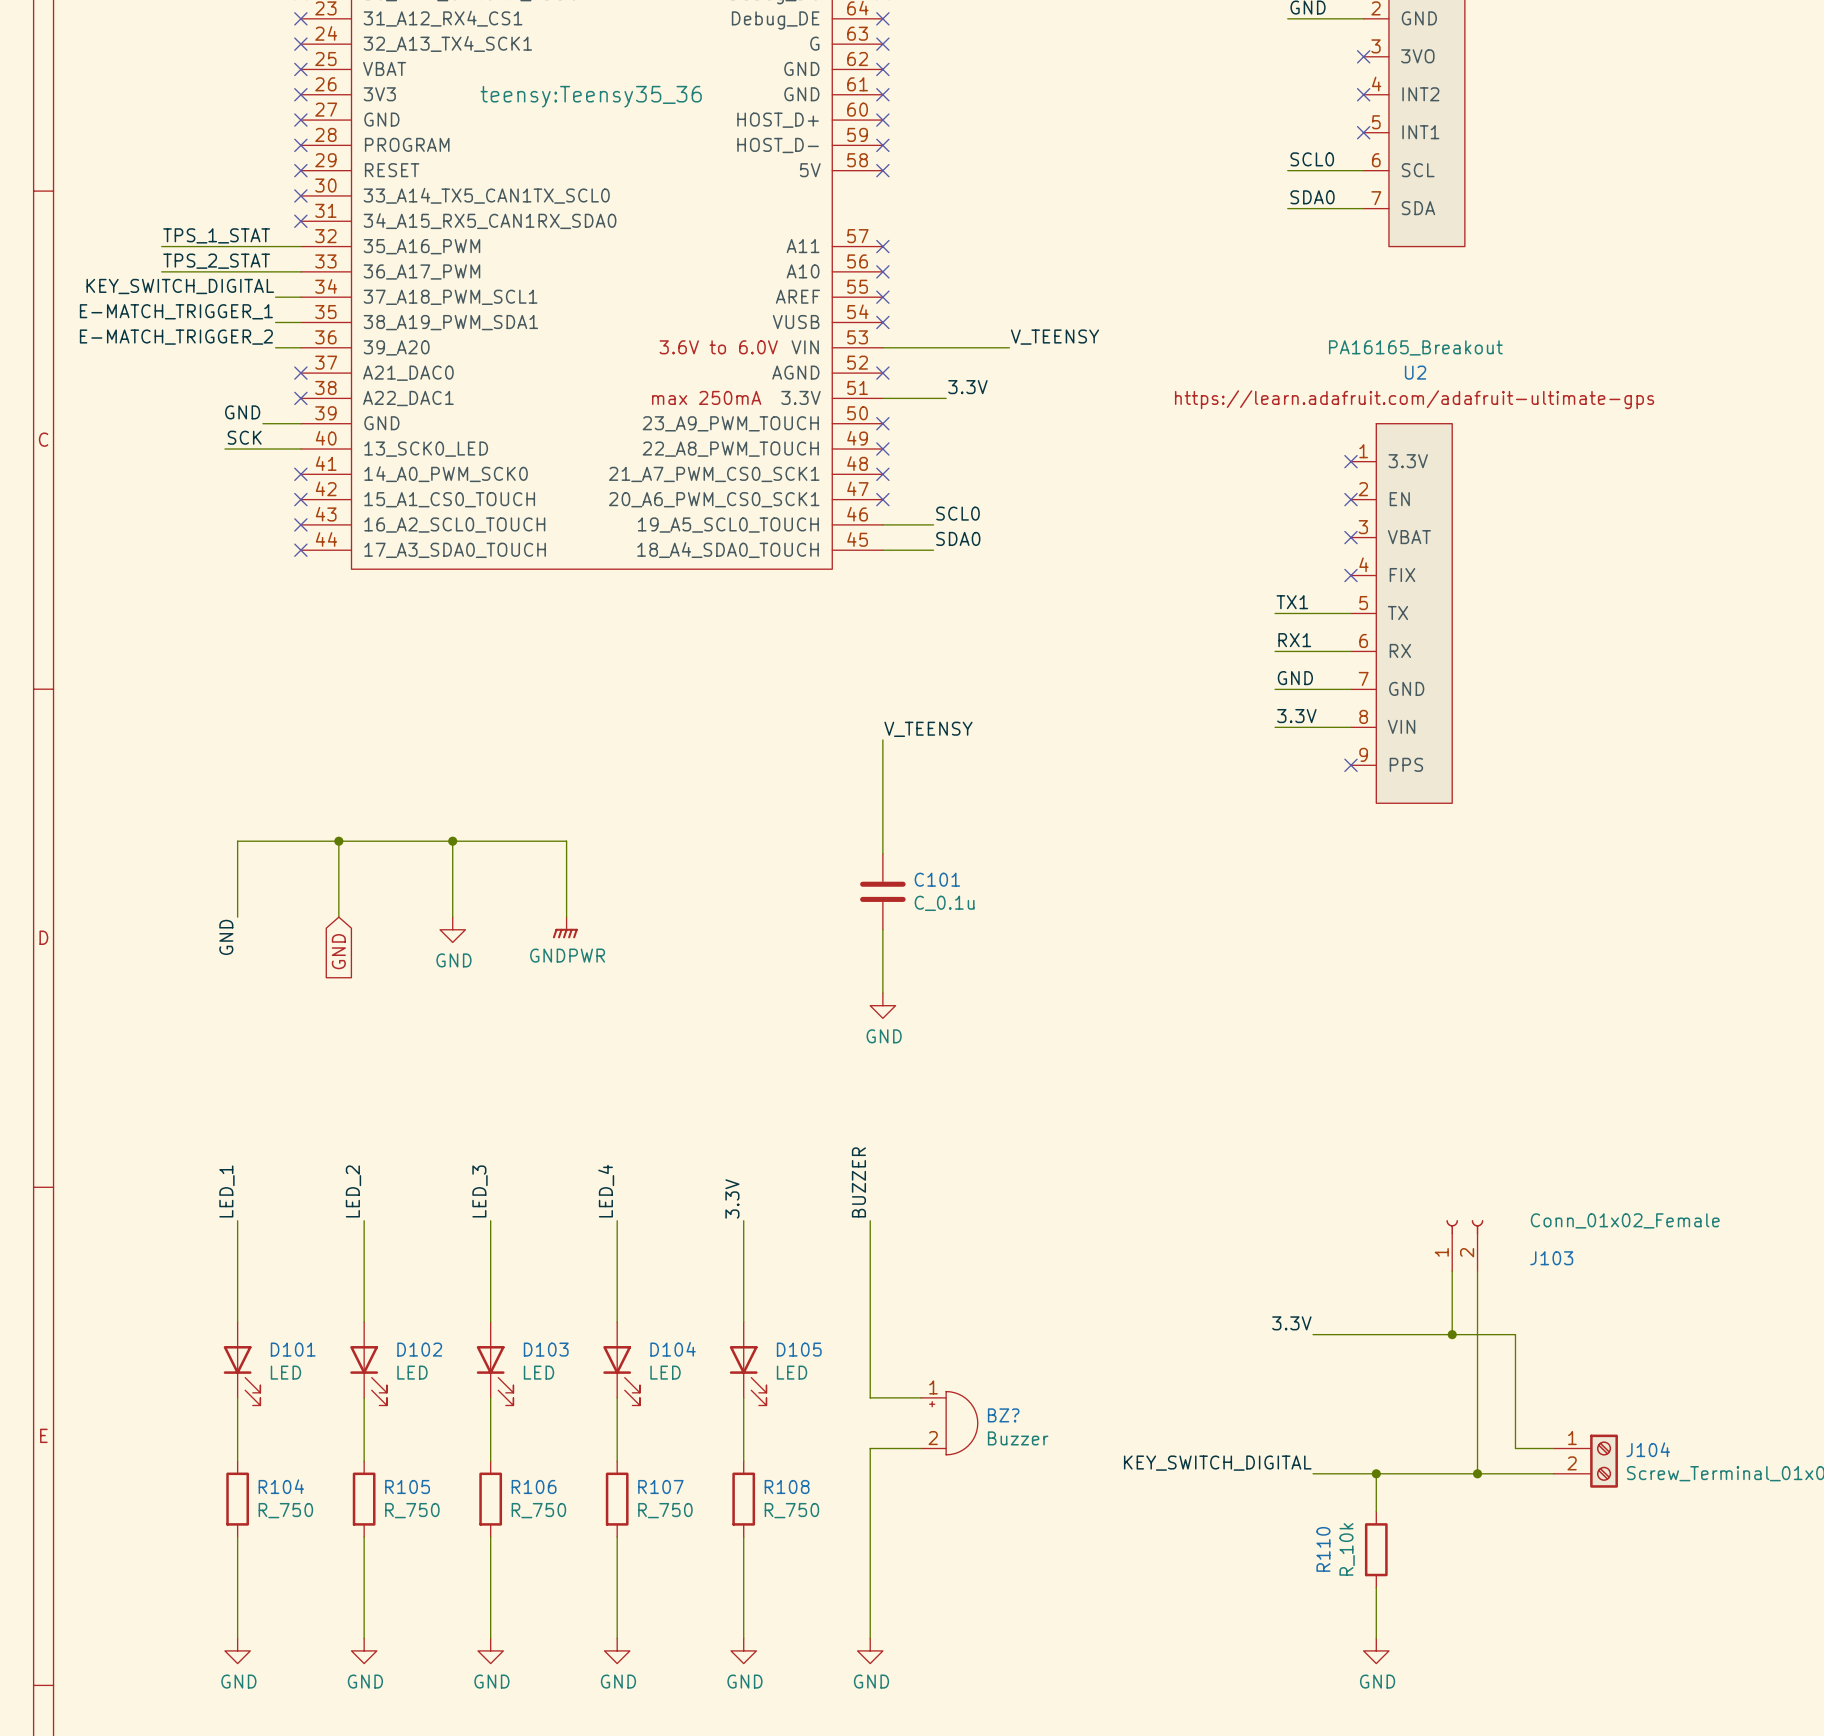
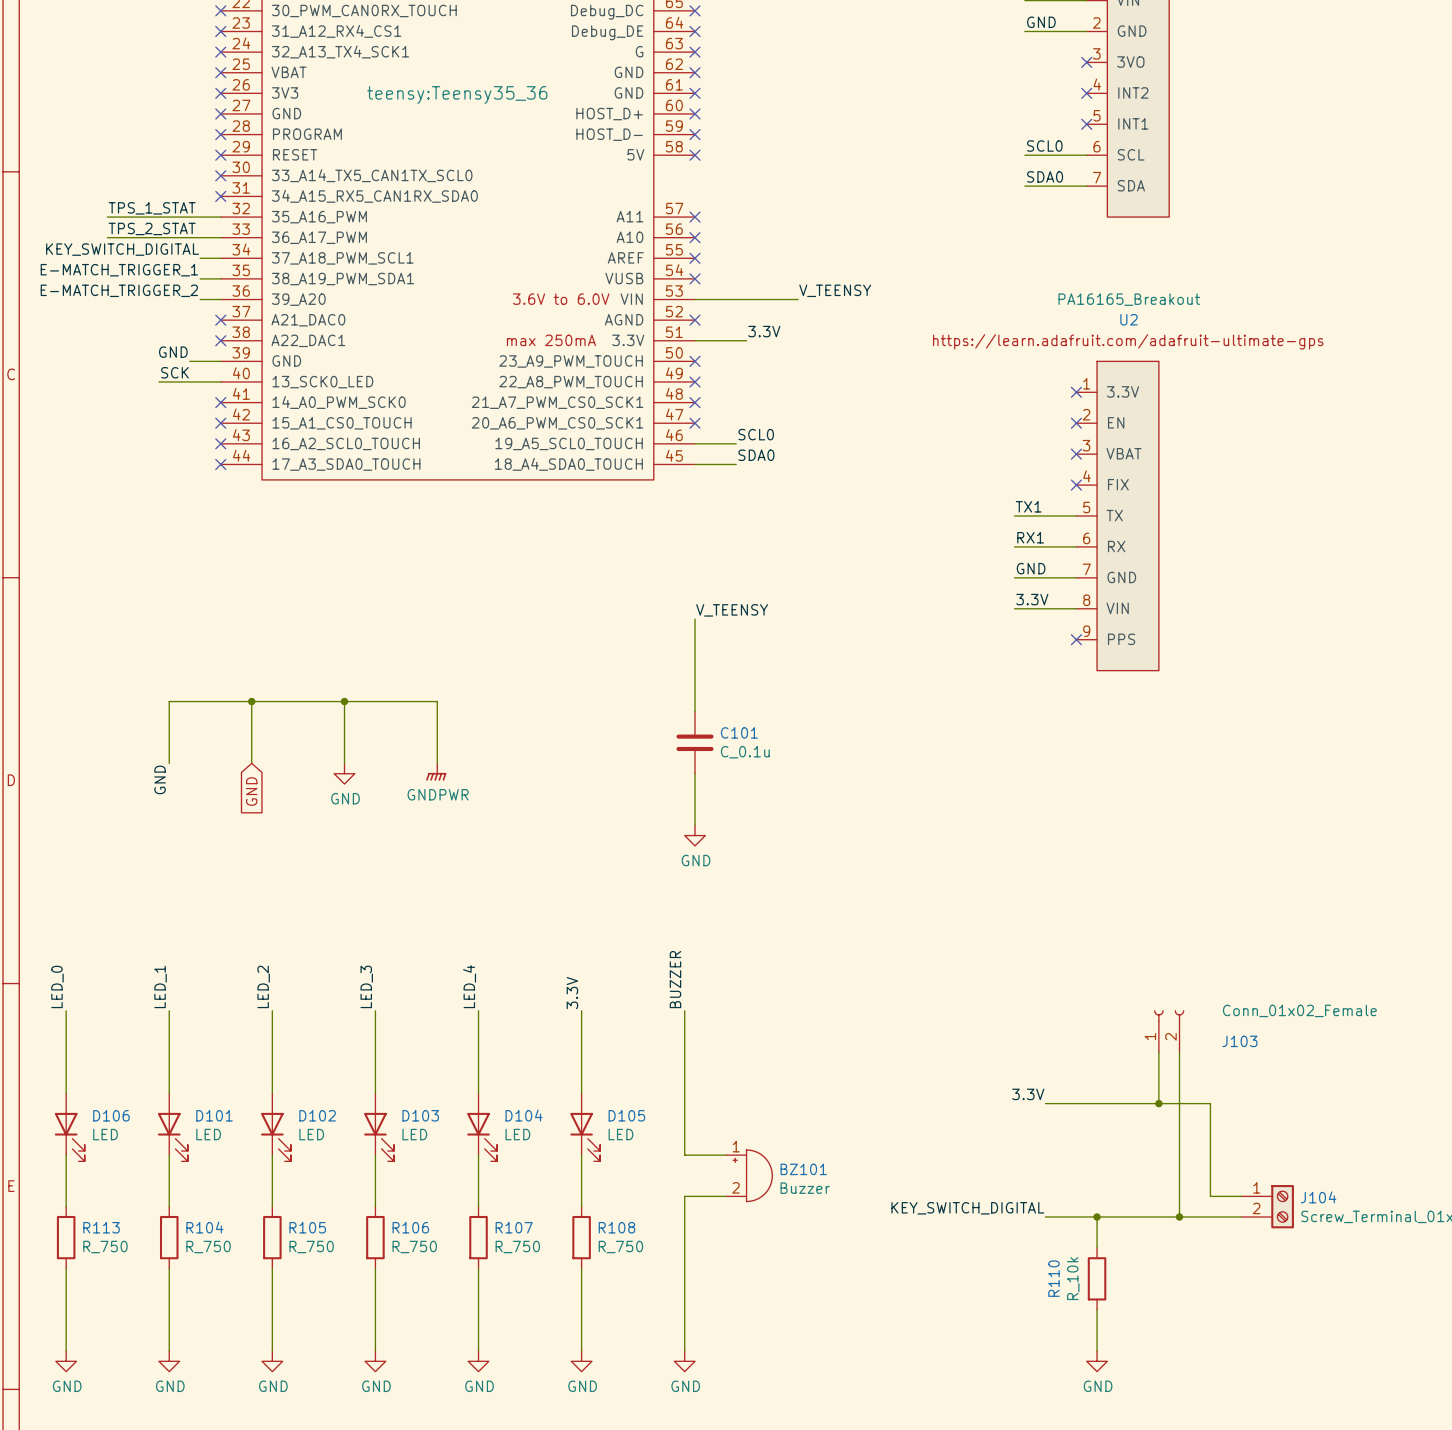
label: none -> LED_0 (57, 986)
wire: none -> (66, 1010) (66, 1093)
D106: none -> LED (69, 1127)
wire: none -> (66, 1155) (66, 1206)
BZ? name: BZ? (1003, 1415) -> BZ101 (803, 1169)
R113: none -> R_750 (66, 1237)
wire: none -> (66, 1268) (66, 1351)
power symbol: none -> GND (66, 1361)

